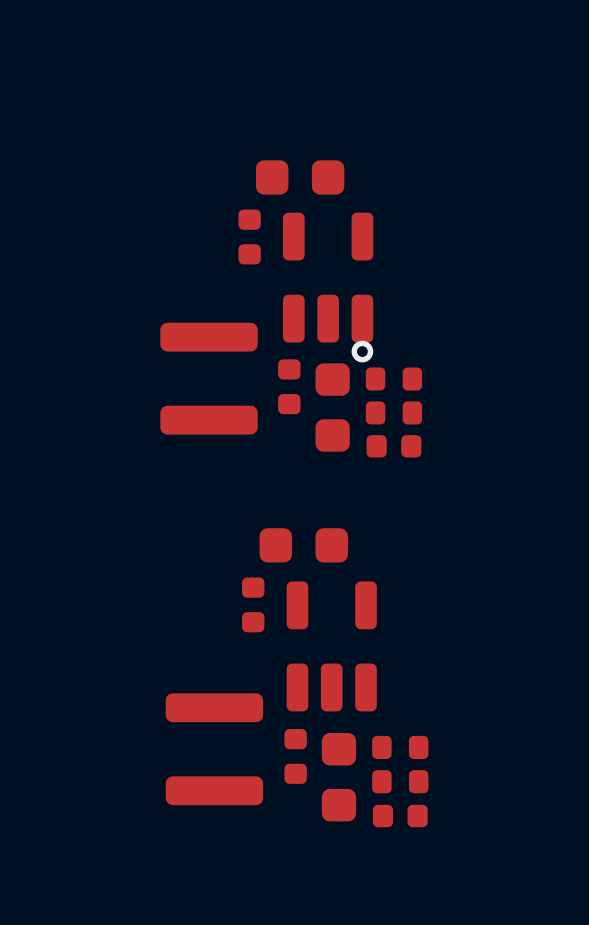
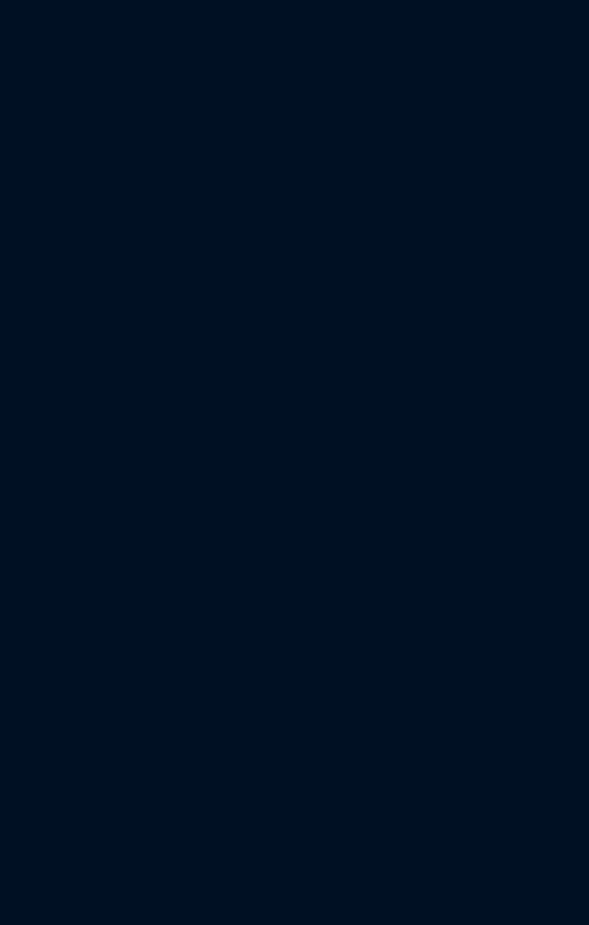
part: (300, 177) -> none
part: (249, 236) -> none
part: (328, 277) -> none
via: (362, 351) -> none
part: (209, 378) -> none
part: (393, 379) -> none
part: (289, 386) -> none
part: (332, 407) -> none
part: (393, 412) -> none
part: (393, 446) -> none
part: (303, 545) -> none
part: (253, 604) -> none
part: (331, 646) -> none
part: (400, 747) -> none
part: (214, 749) -> none
part: (295, 756) -> none
part: (338, 777) -> none
part: (400, 781) -> none
part: (400, 816) -> none

